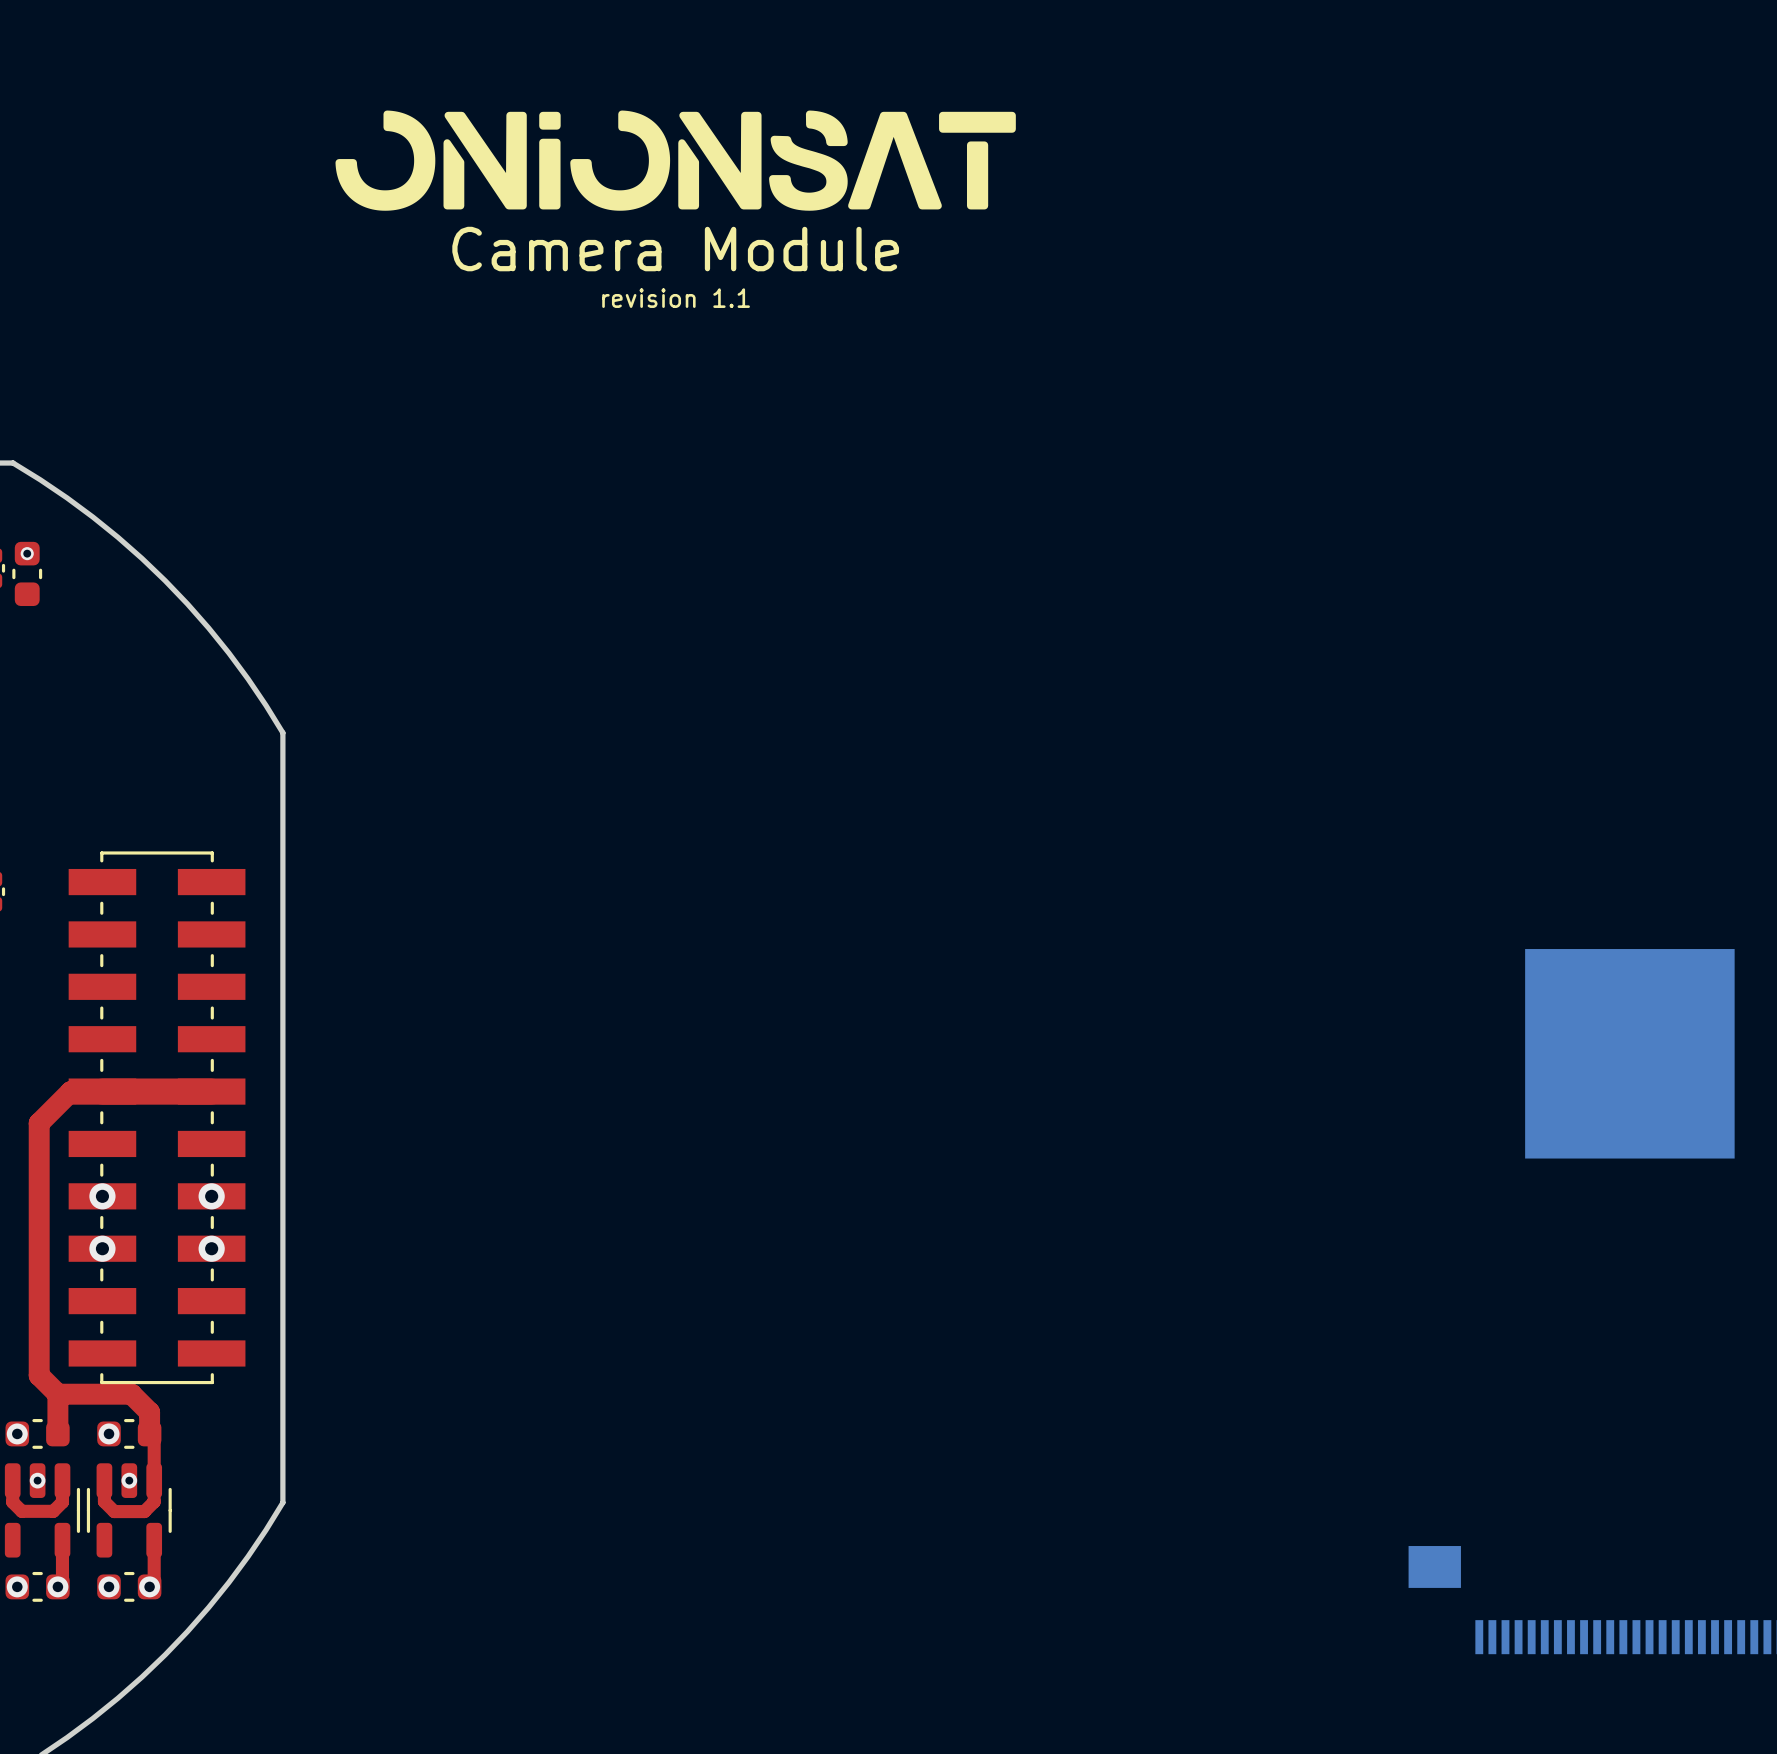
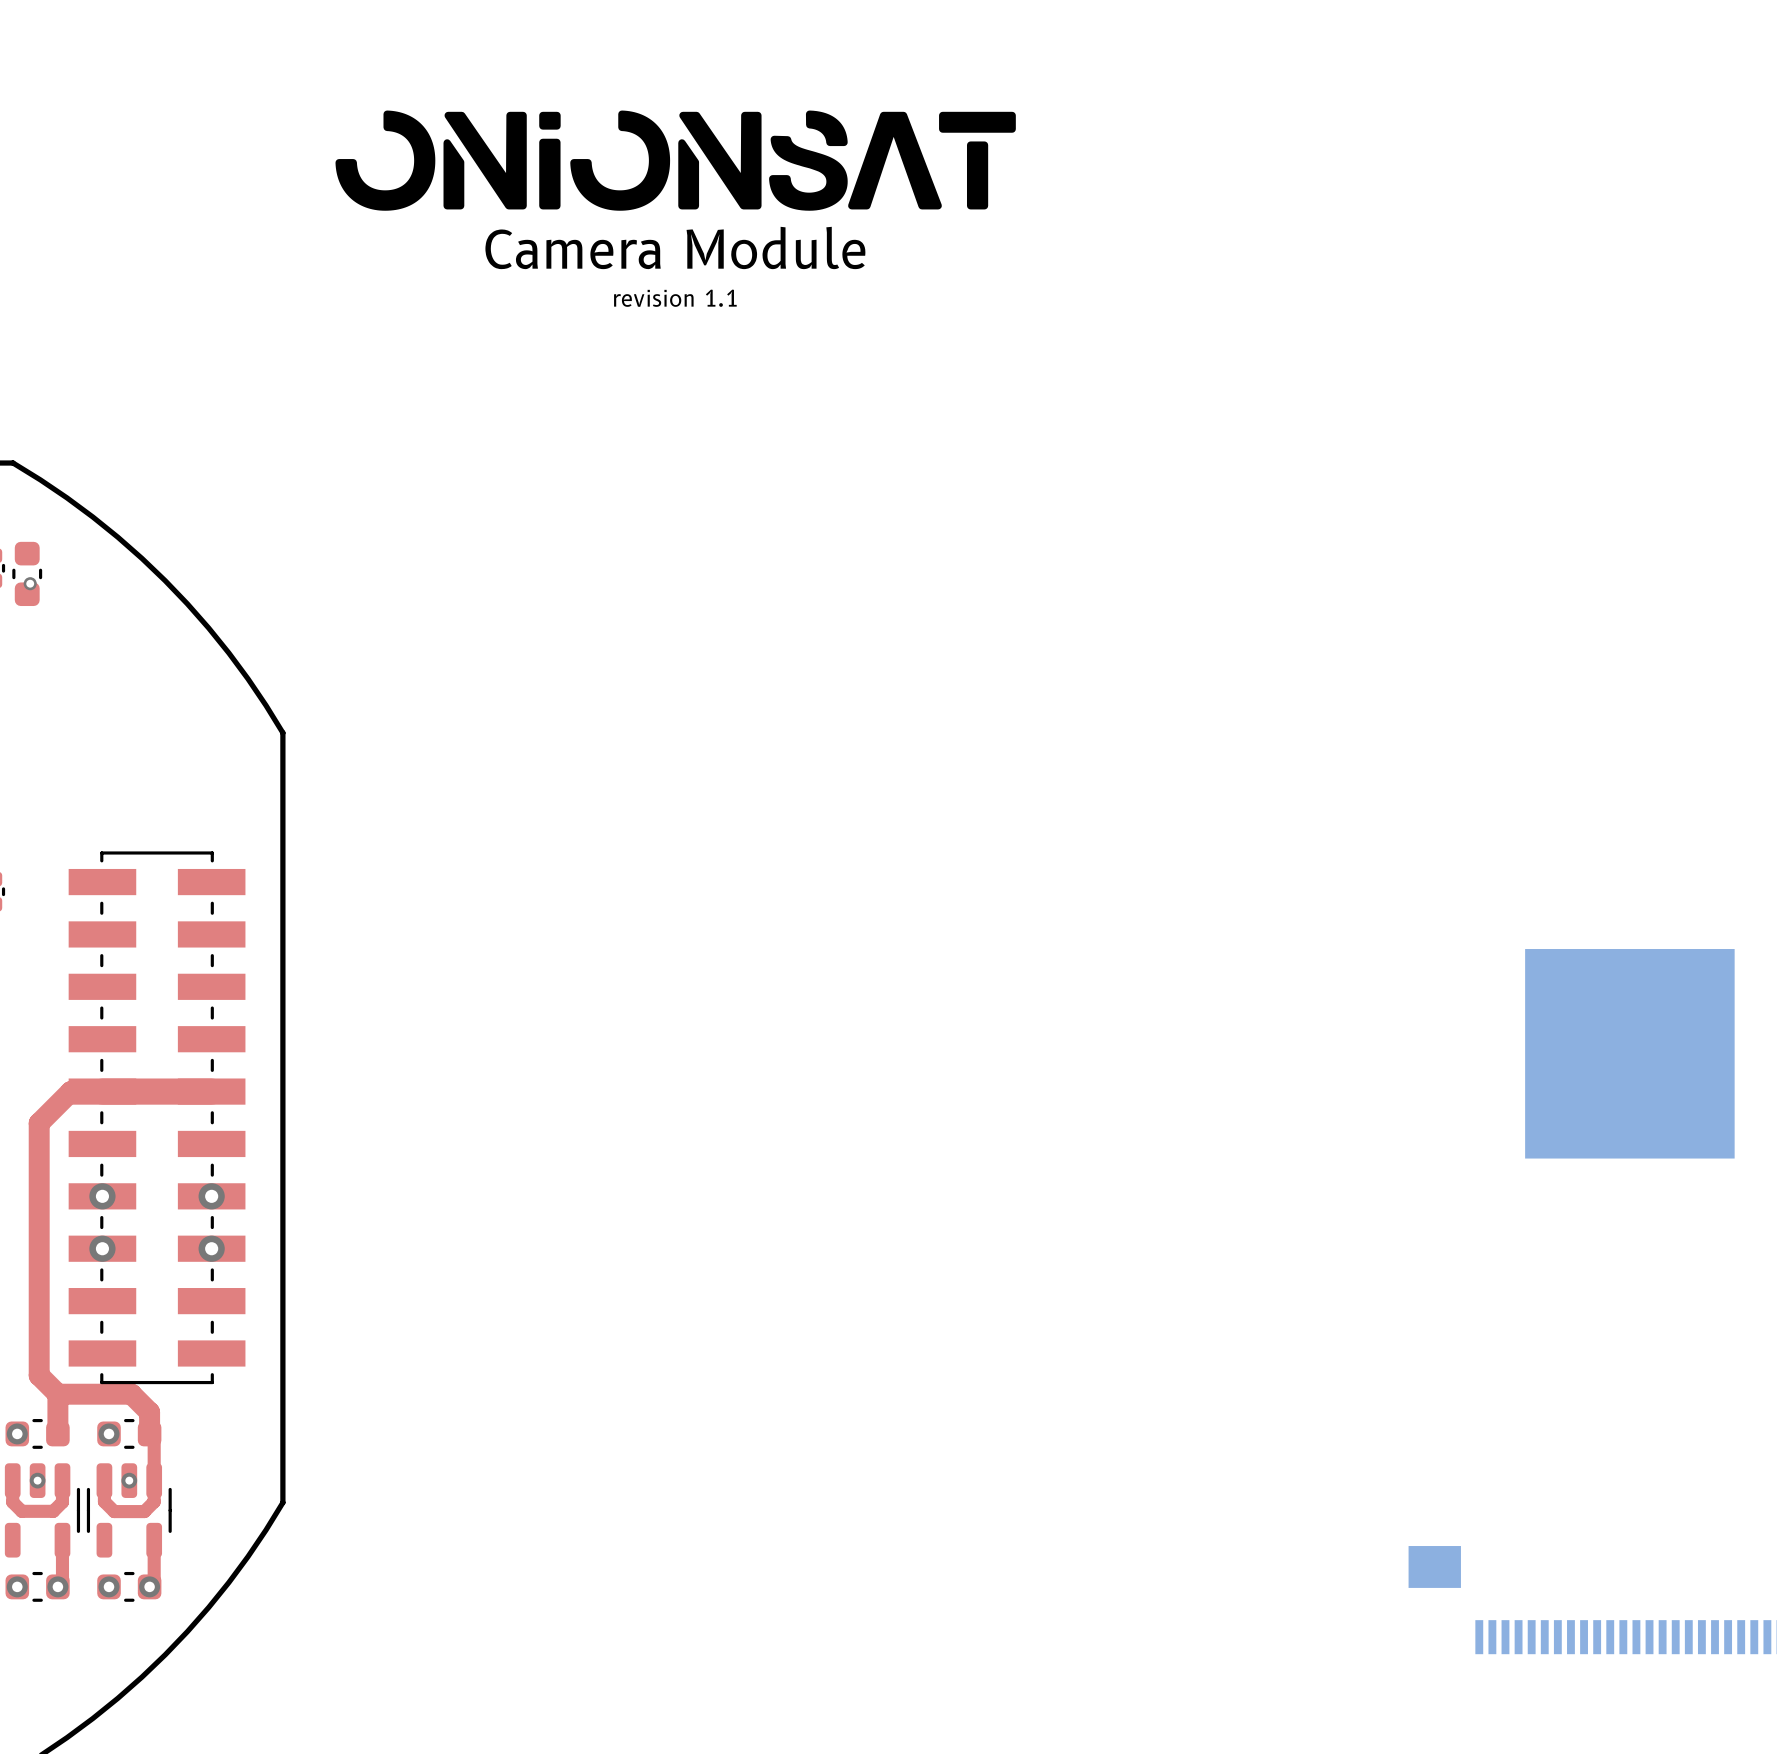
via position: (27, 553) -> (30, 583)

